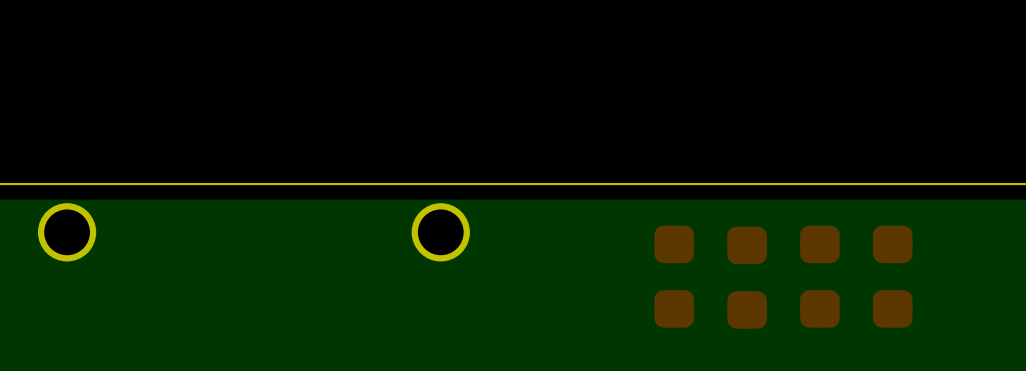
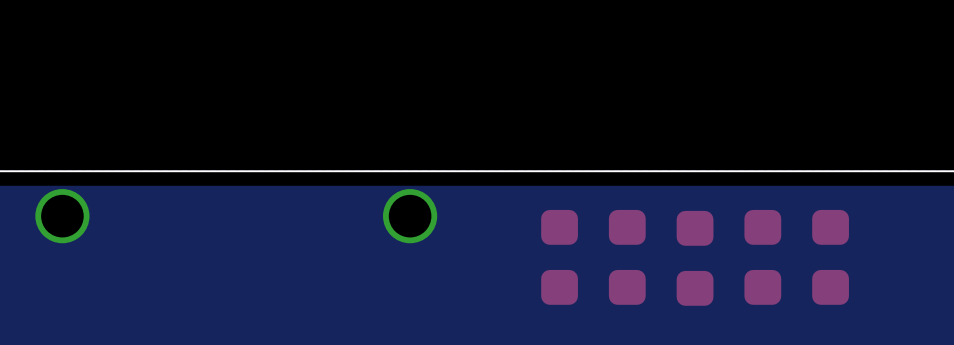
part: none -> (559, 257)

